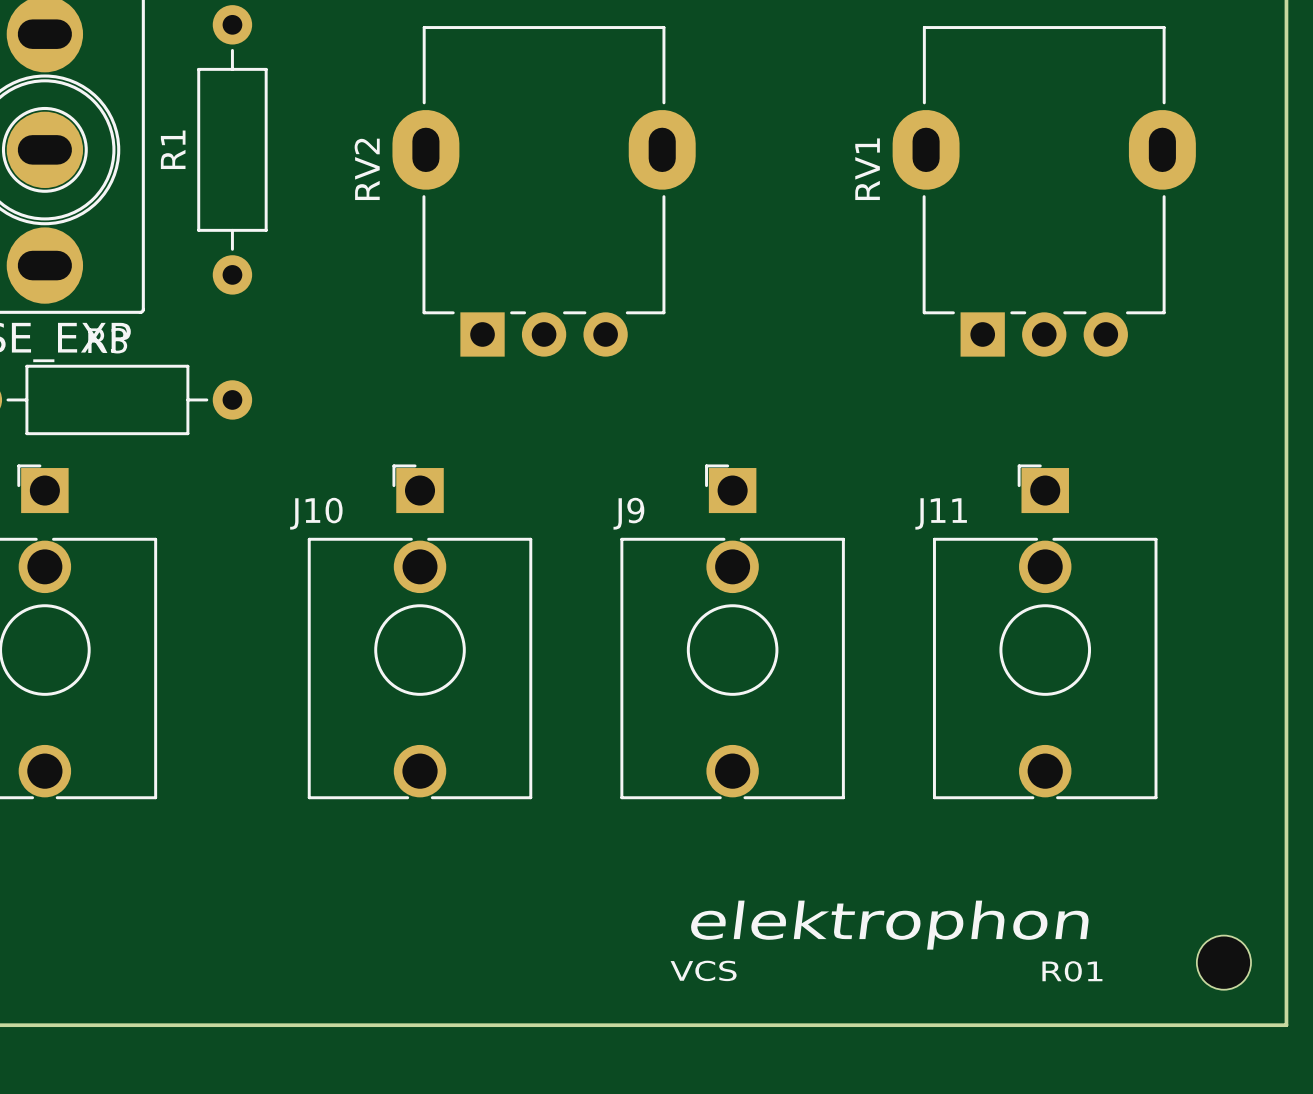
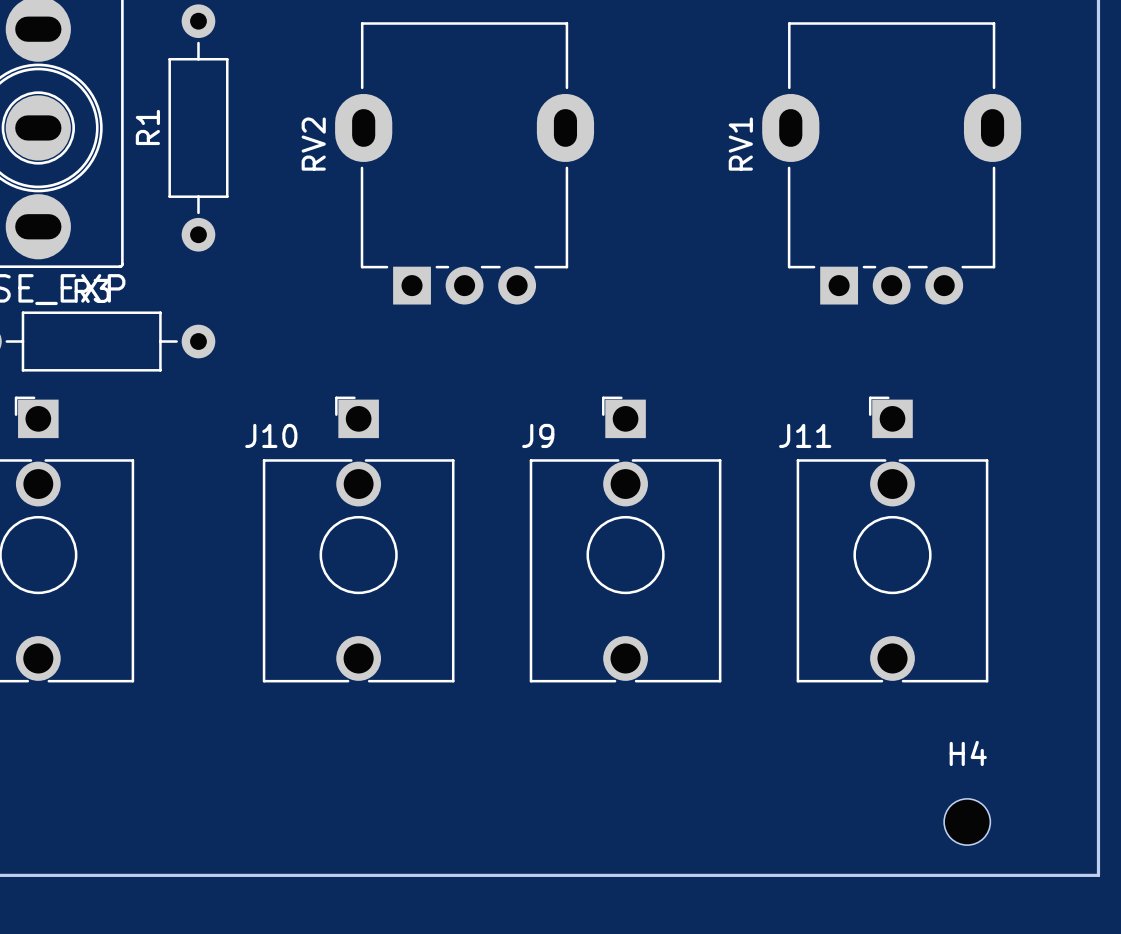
drawing: [670, 900, 1103, 982] -> none
H4: none -> (967, 821)
part: (1223, 962) -> none

